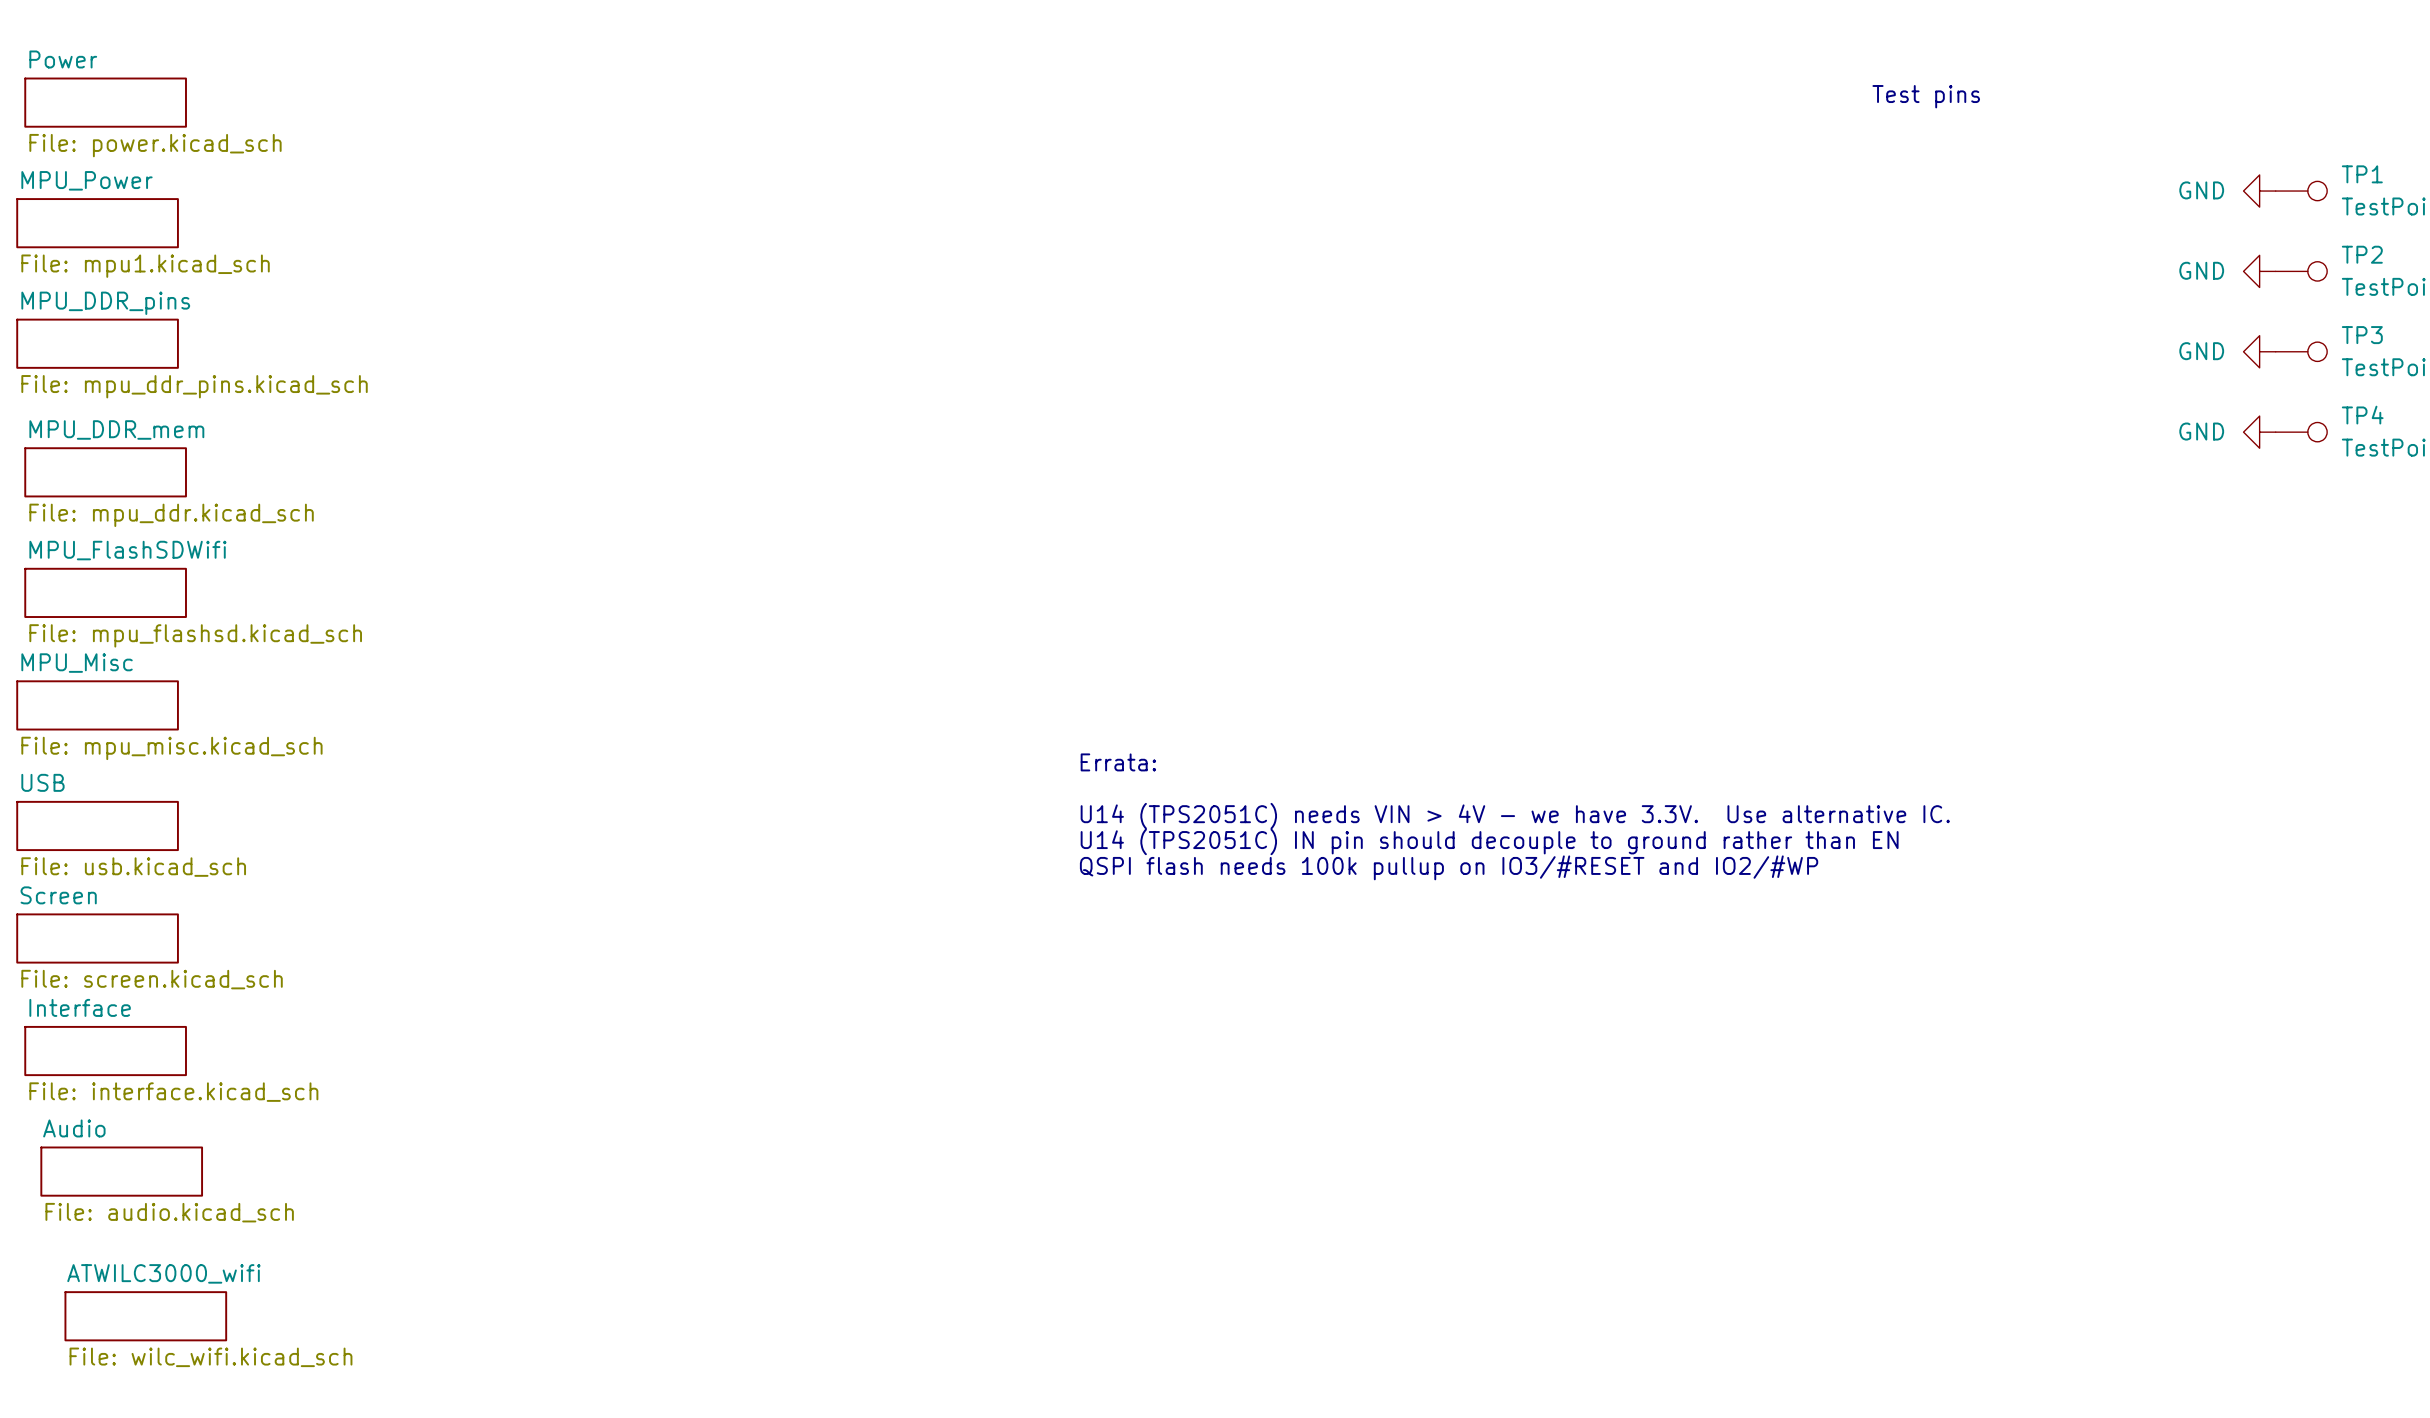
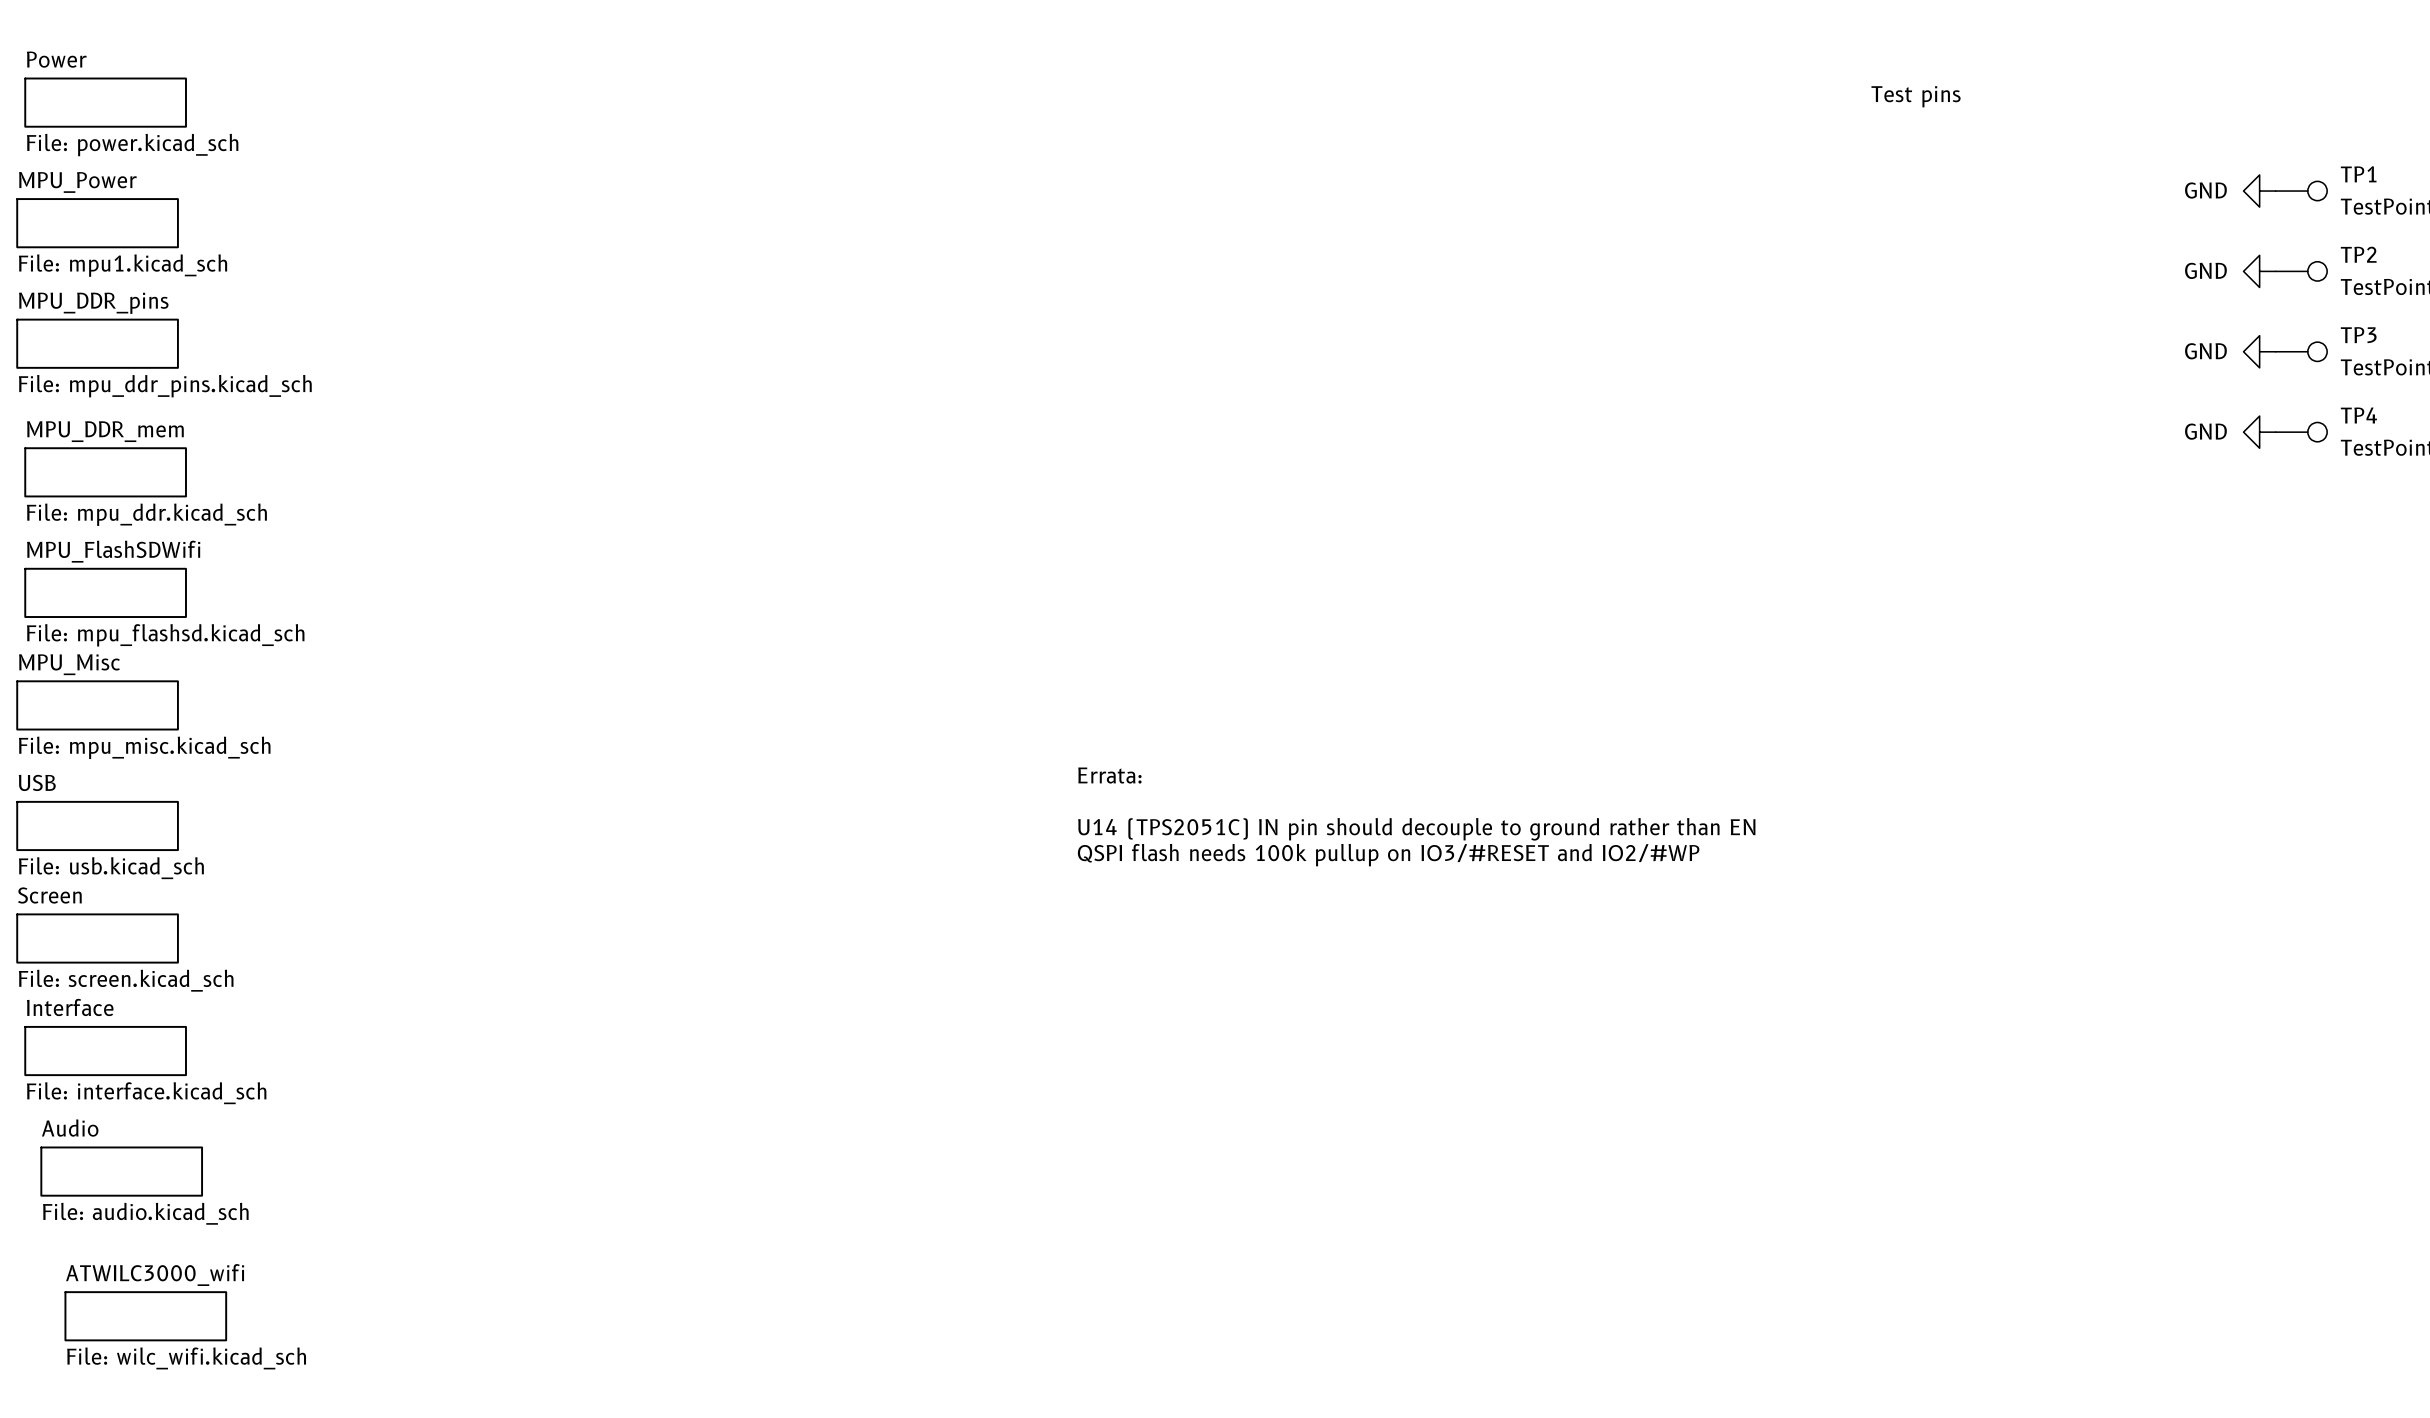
text position: Errata: (1118, 762) -> Errata: (1109, 775)
text: U14 (TPS2051C) needs VIN > 4V - we have 3.3V. Use alternative IC. (1515, 816) -> none
text position: U14 (TPS2051C) IN pin should decouple to ground rather than EN (1489, 841) -> U14 (TPS2051C) IN pin should decouple to ground rather than EN (1416, 829)
text position: QSPI flash needs 100k pullup on IO3/#RESET and IO2/#WP (1449, 867) -> QSPI flash needs 100k pullup on IO3/#RESET and IO2/#WP (1388, 855)

